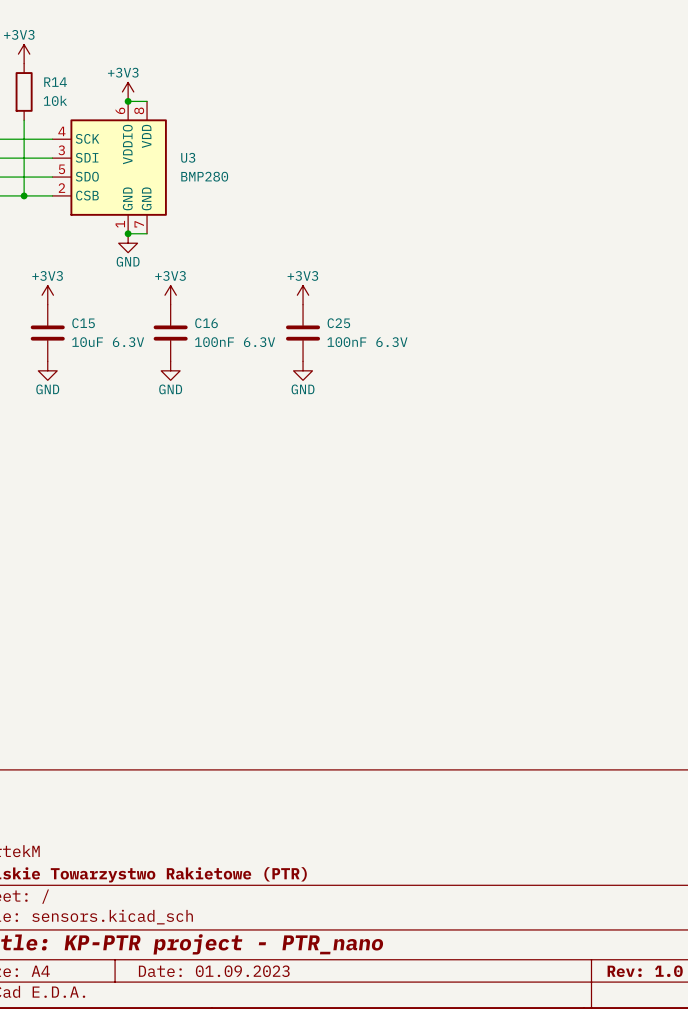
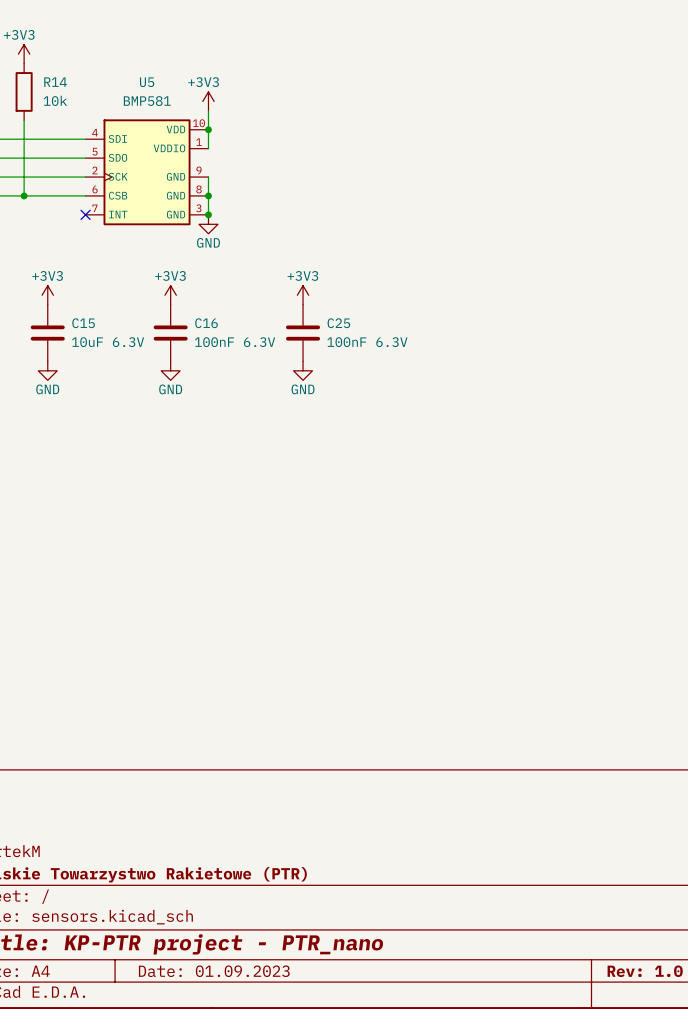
power symbol position: +3V3 (128, 91) -> +3V3 (208, 101)
wire: (128, 101) (147, 101) -> none
junction: (128, 101) -> none
wire: none -> (208, 110) (208, 148)
junction: none -> (208, 129)
U3: BMP280 (109, 167) -> none
U5: none -> BMP581 (147, 172)
wire: none -> (208, 177) (208, 214)
junction: none -> (208, 195)
no-connect mark: none -> (85, 214)
junction: none -> (208, 214)
wire: (128, 233) (147, 233) -> none
junction: (128, 233) -> none
power symbol position: GND (128, 243) -> GND (208, 224)

